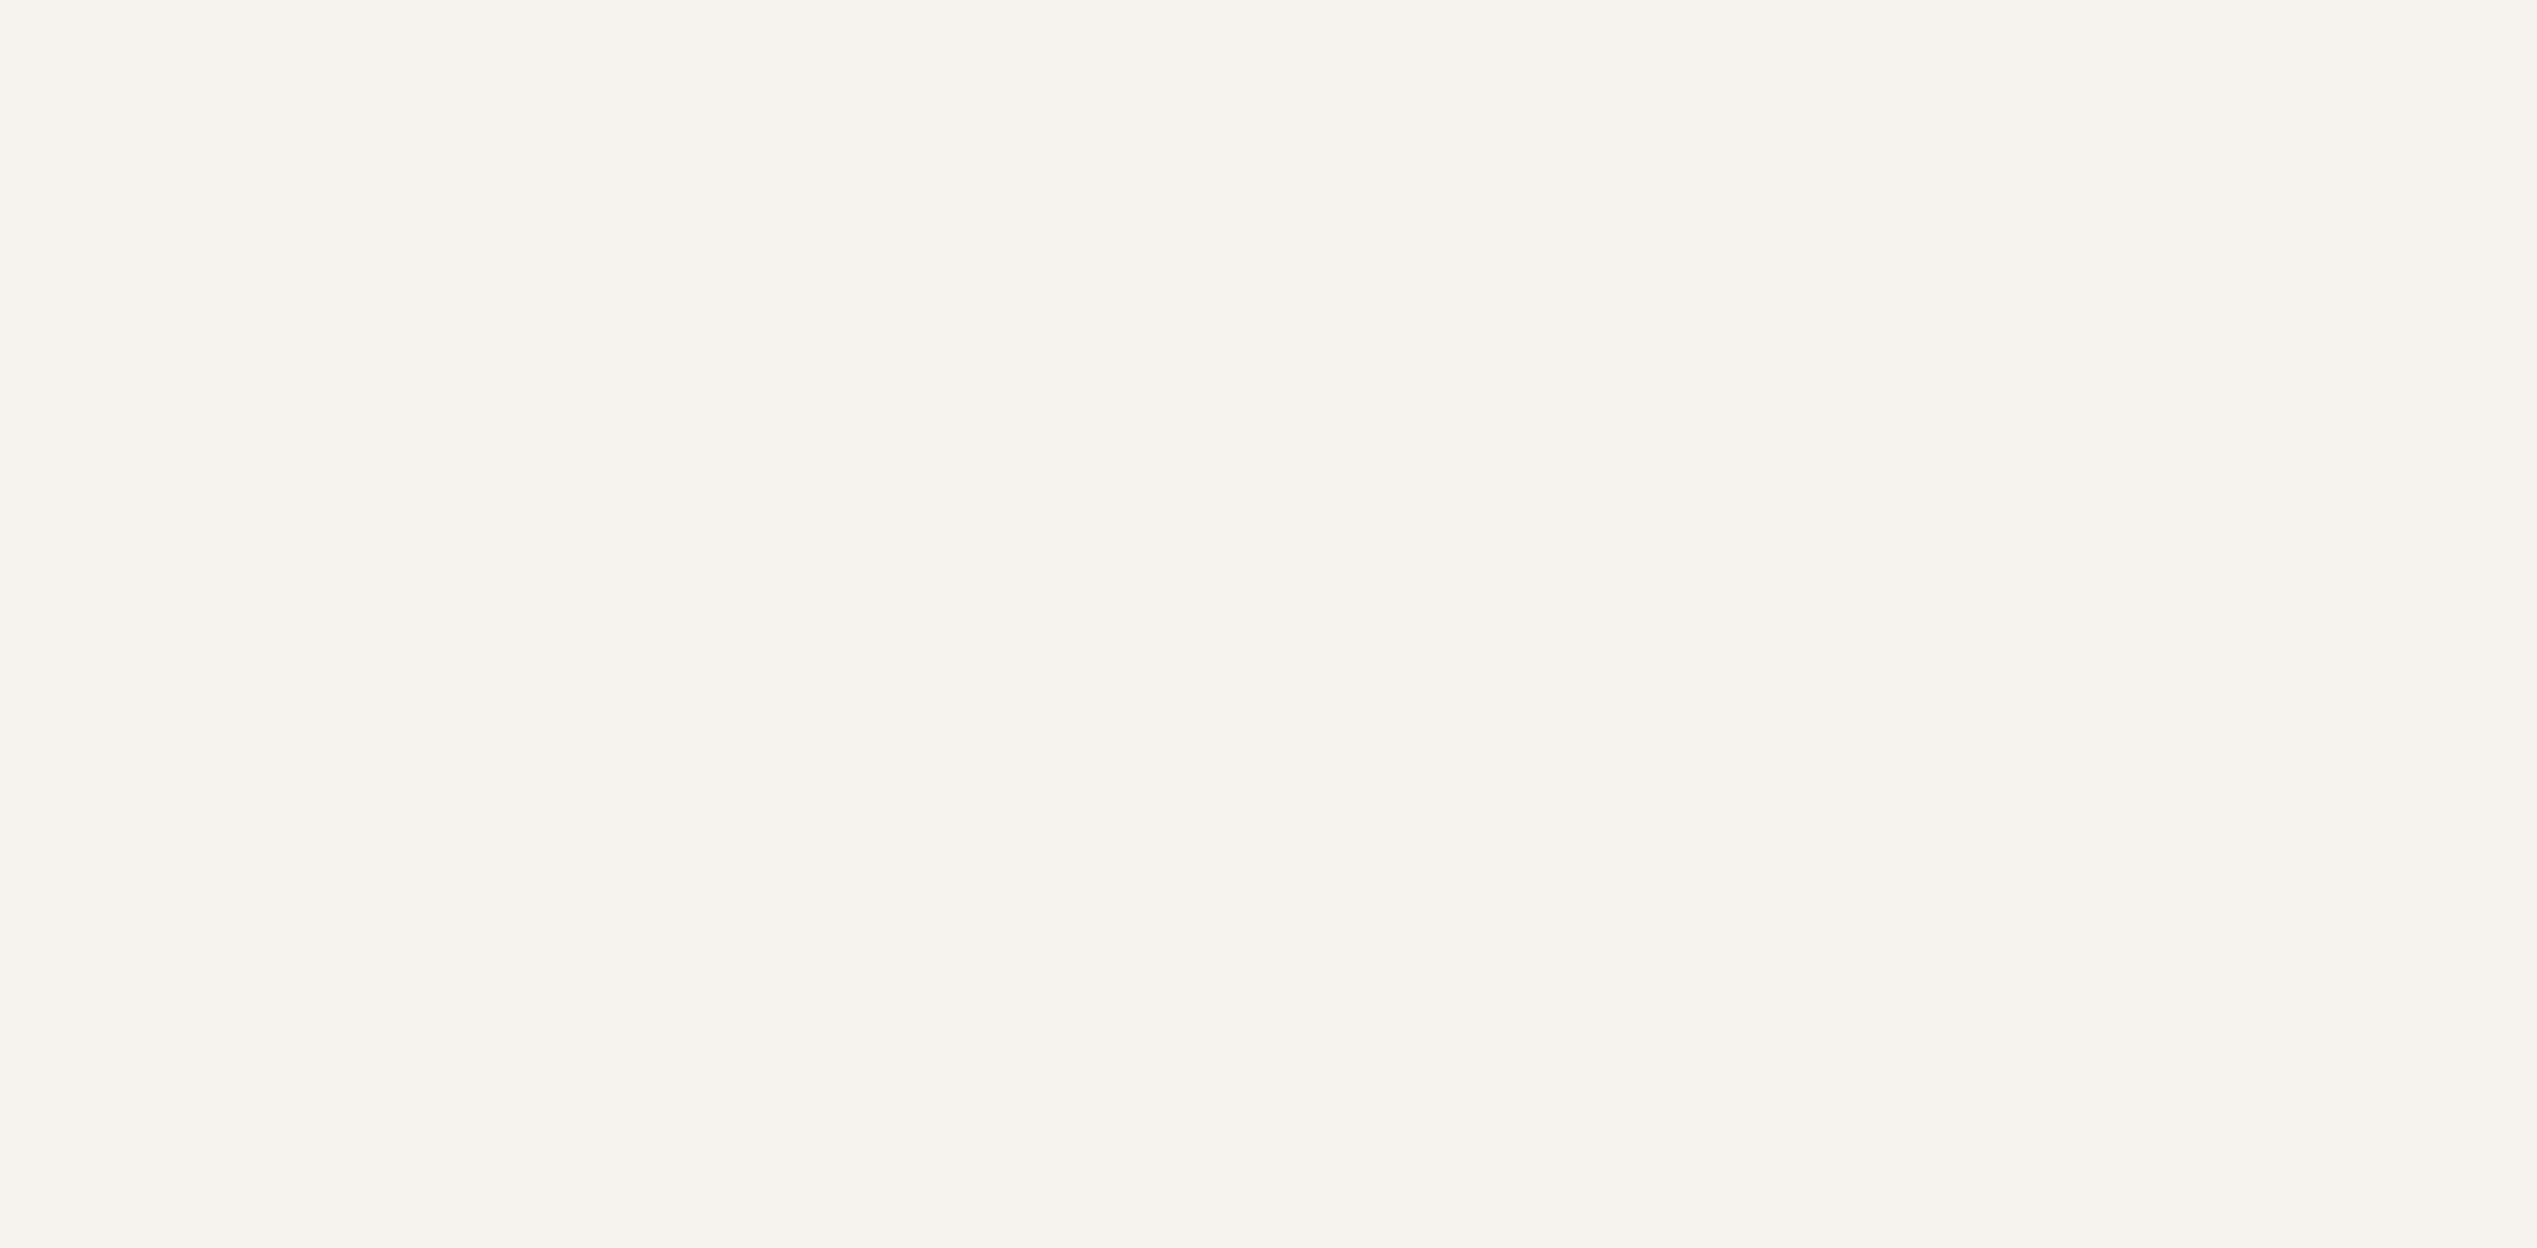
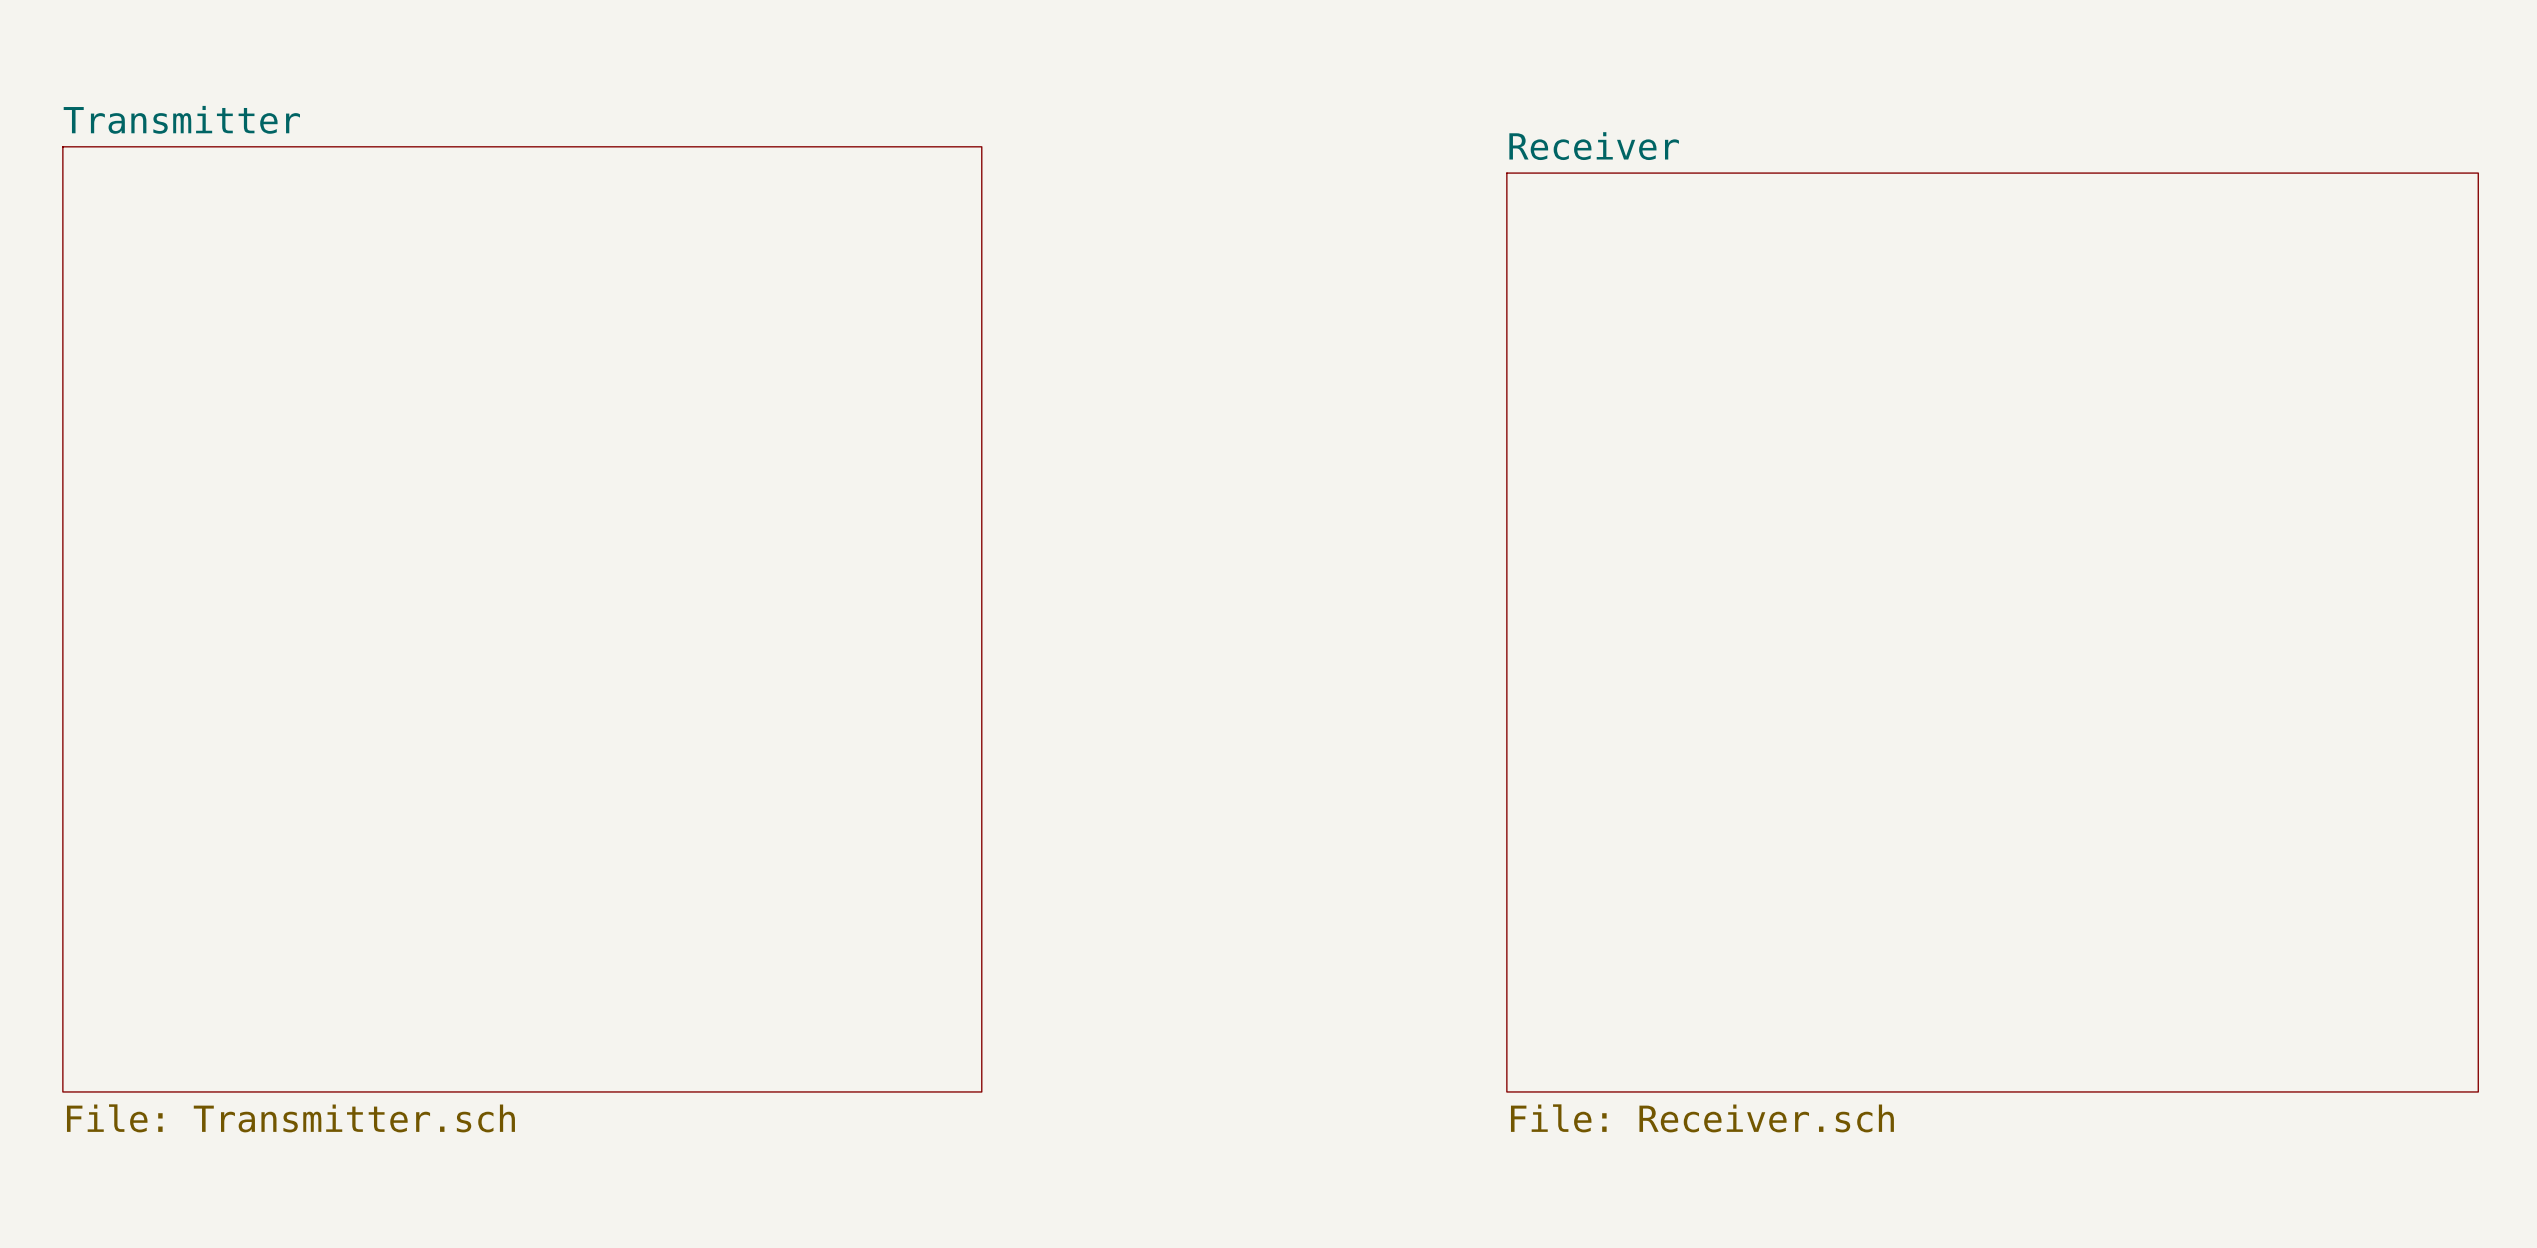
sheet Transmitter: none -> File: Transmitter.sch (522, 619)
sheet Receiver: none -> File: Receiver.sch (1992, 632)

